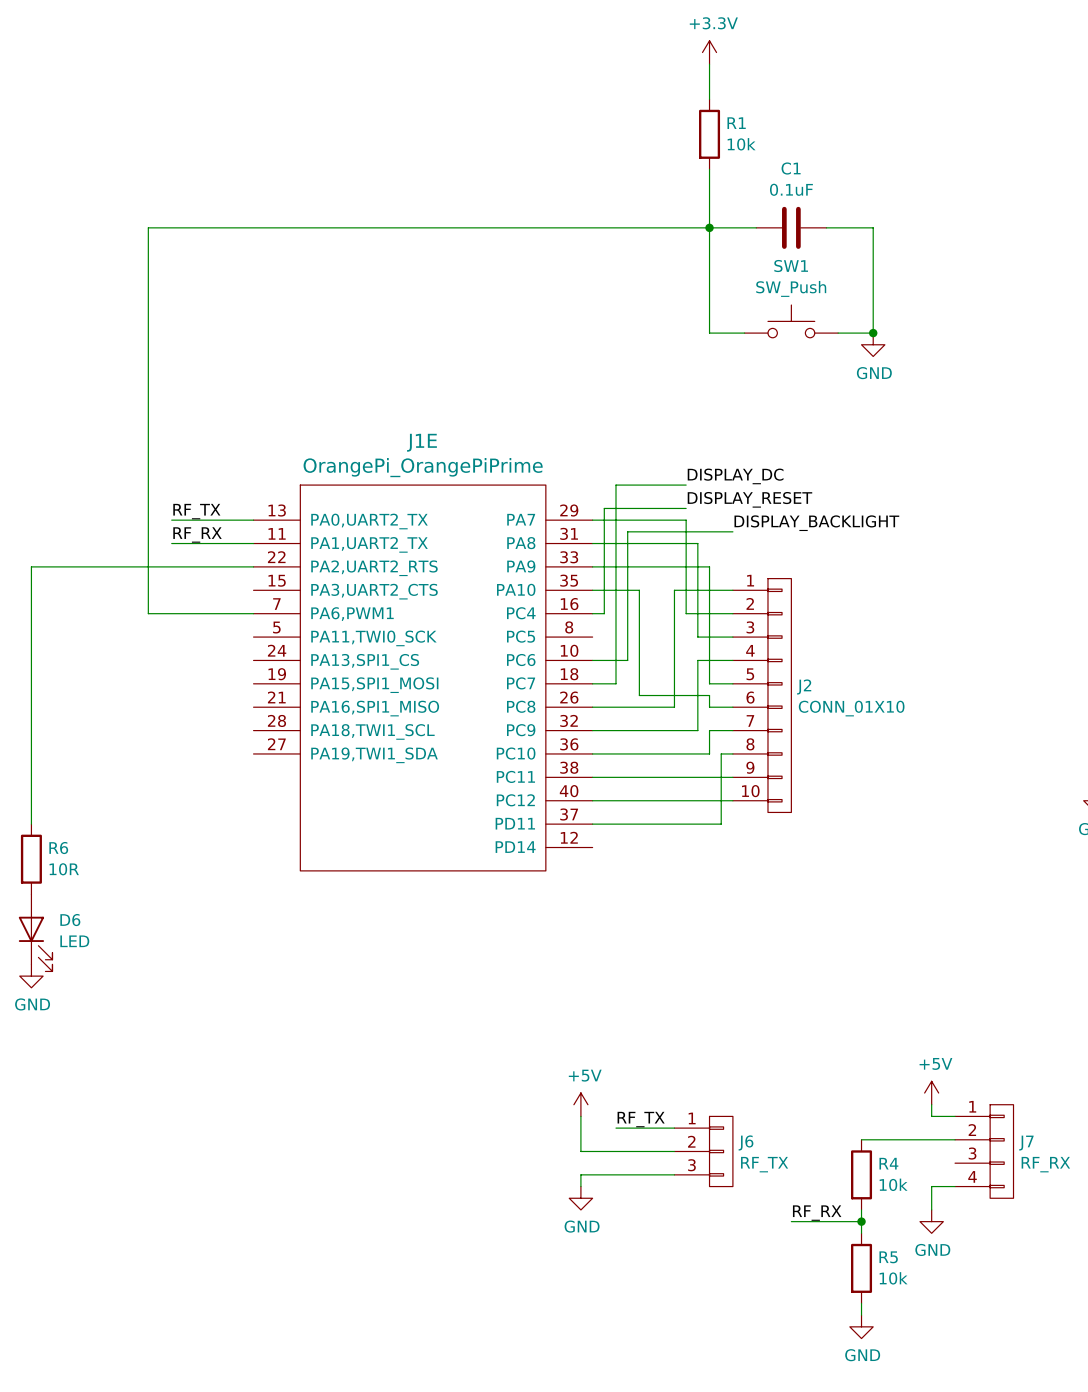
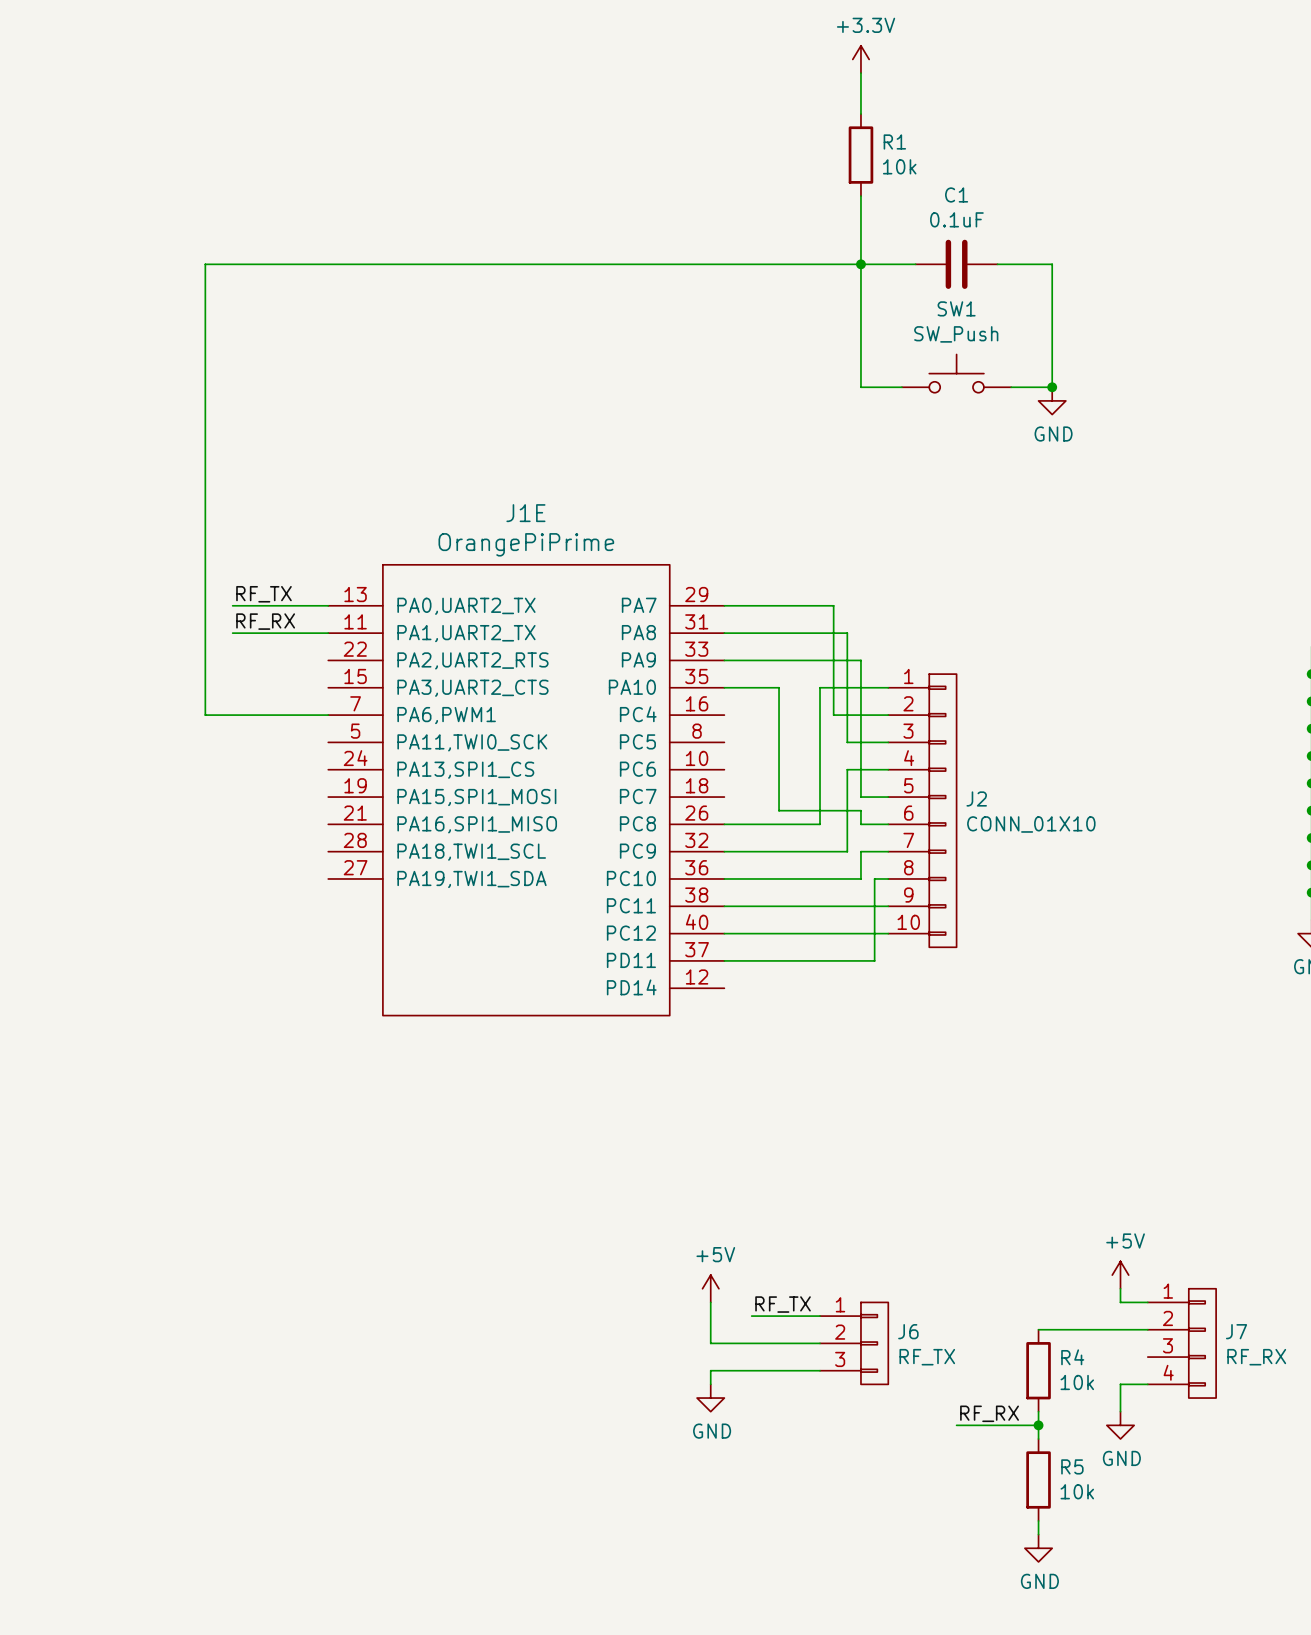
J1E value: OrangePi_OrangePiPrime (423, 467) -> OrangePiPrime (526, 544)
label: DISPLAY_DC (735, 476) -> none
wire: (686, 485) (616, 485) (616, 683) (592, 683) -> none
label: DISPLAY_RESET (749, 499) -> none
wire: (686, 508) (604, 508) (604, 613) (592, 613) -> none
label: DISPLAY_BACKLIGHT (816, 523) -> none
wire: (732, 531) (627, 531) (627, 660) (592, 660) -> none
wire: (253, 566) (31, 566) (31, 824) -> none
R6: 10R (31, 859) -> none
D6: LED (35, 932) -> none
power symbol: GND (31, 976) -> none

